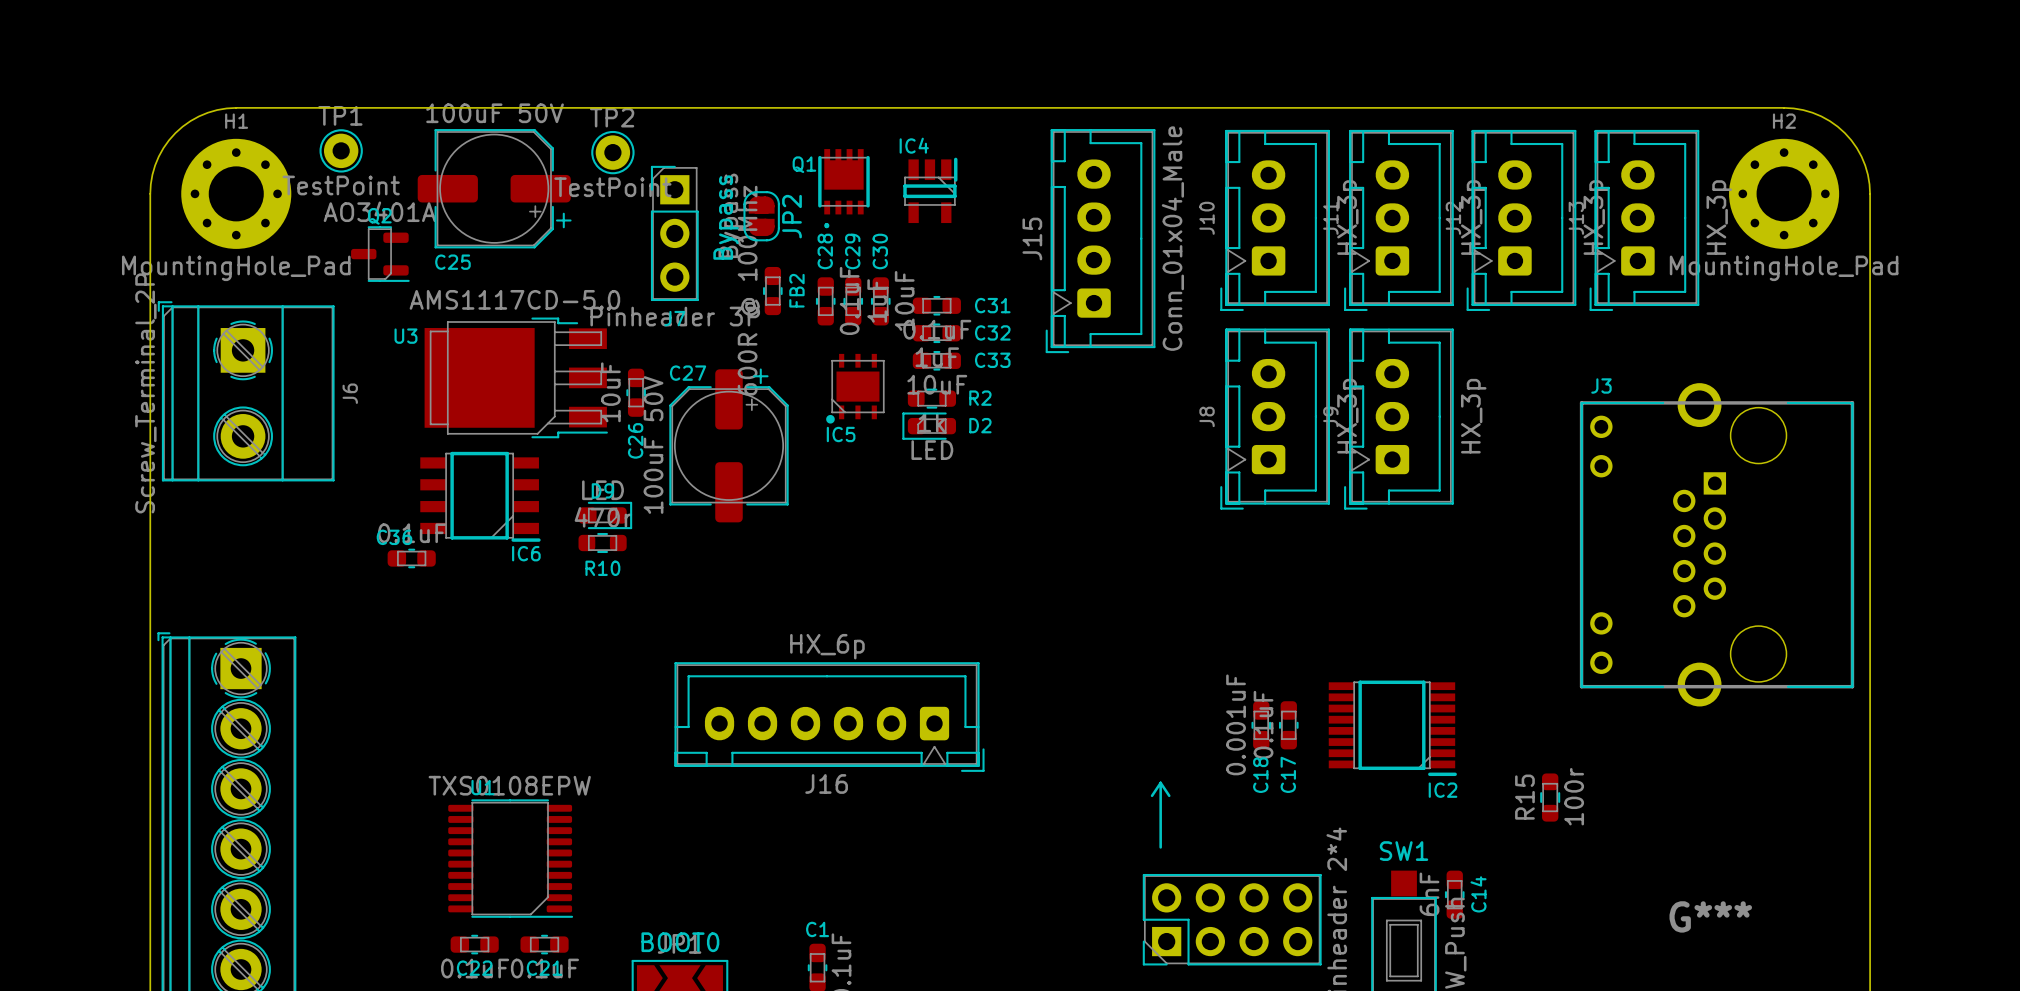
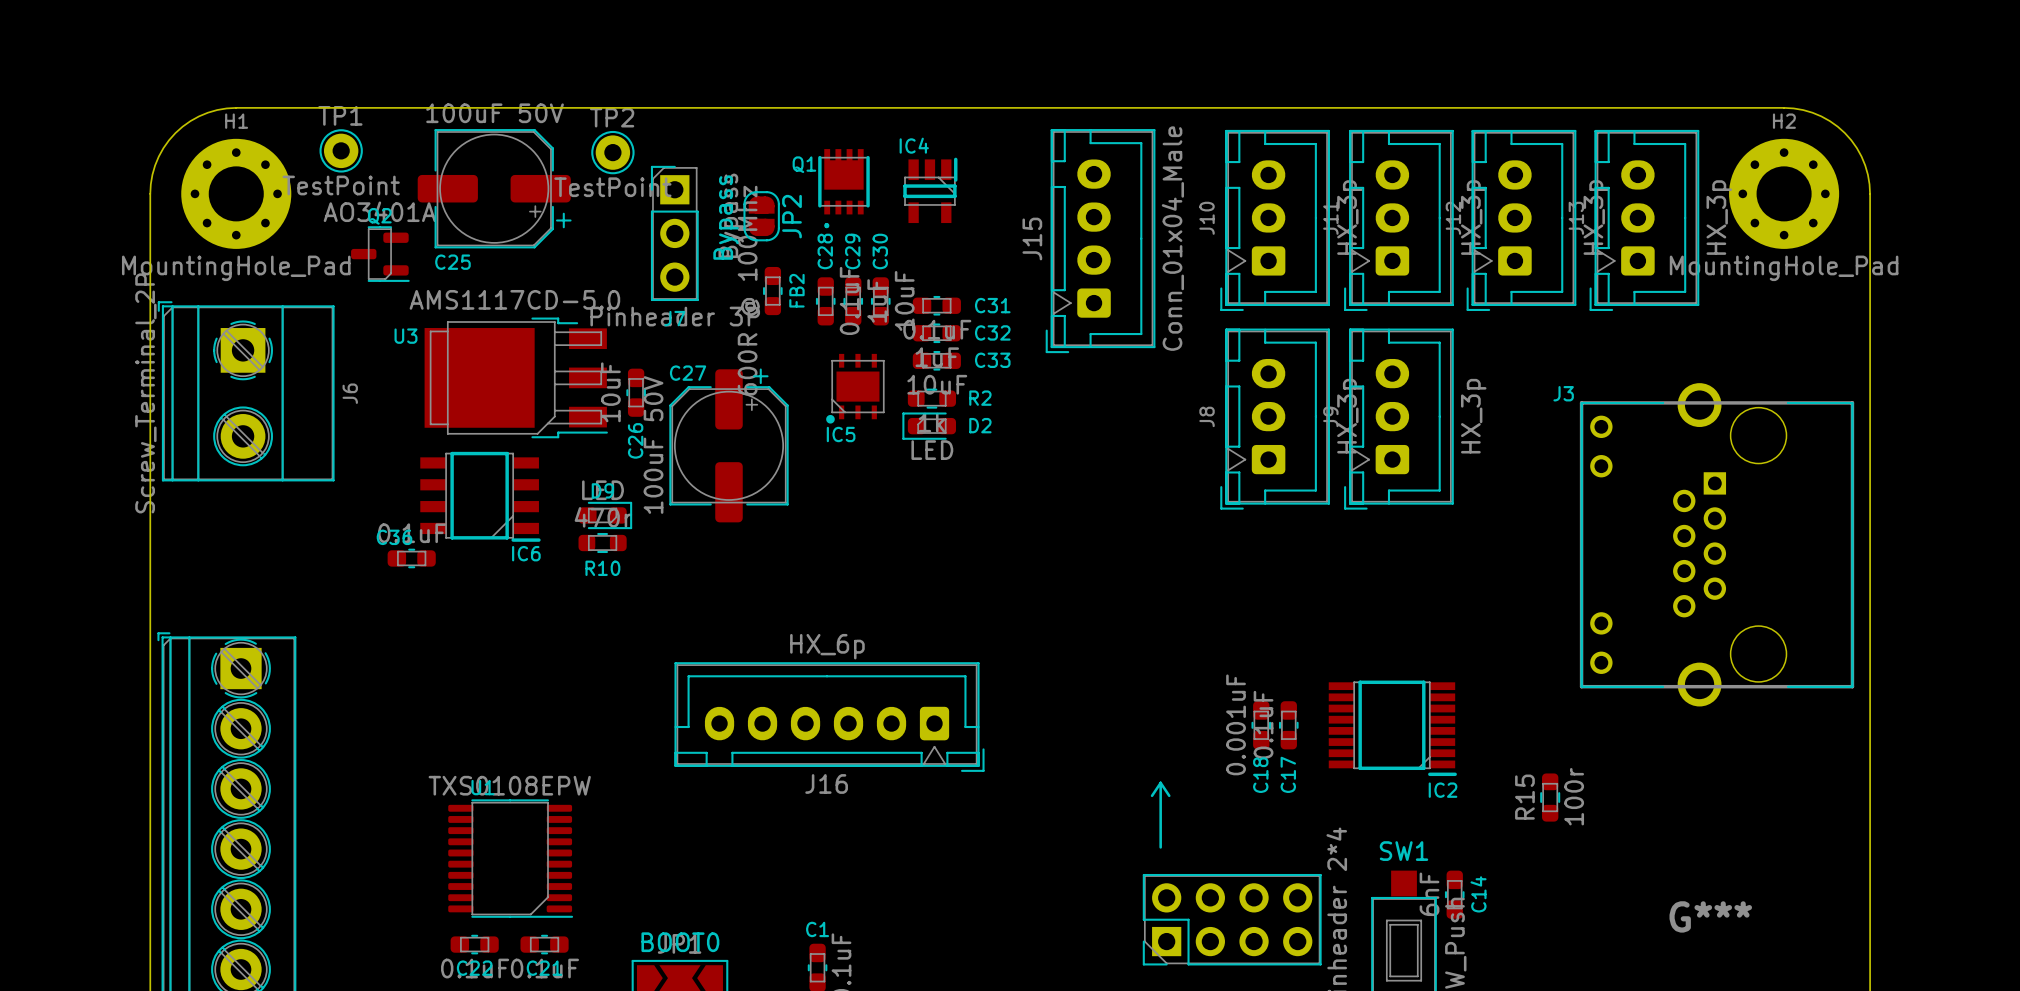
J3 name position: J3 (1601, 386) -> J3 (1563, 393)

